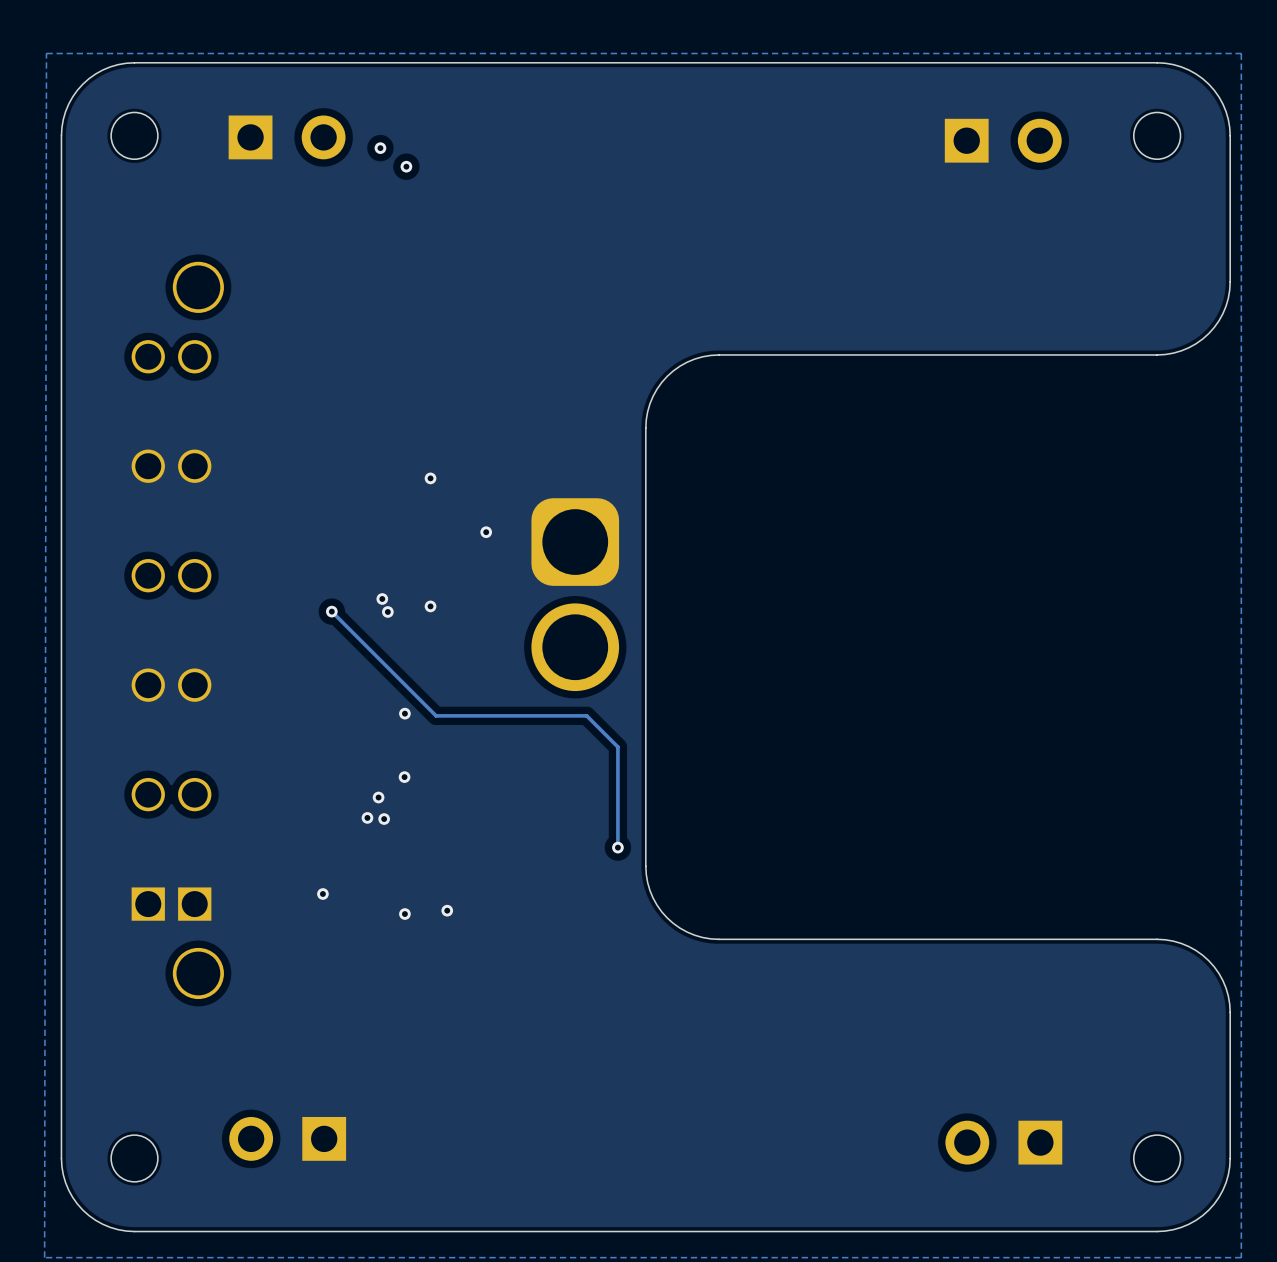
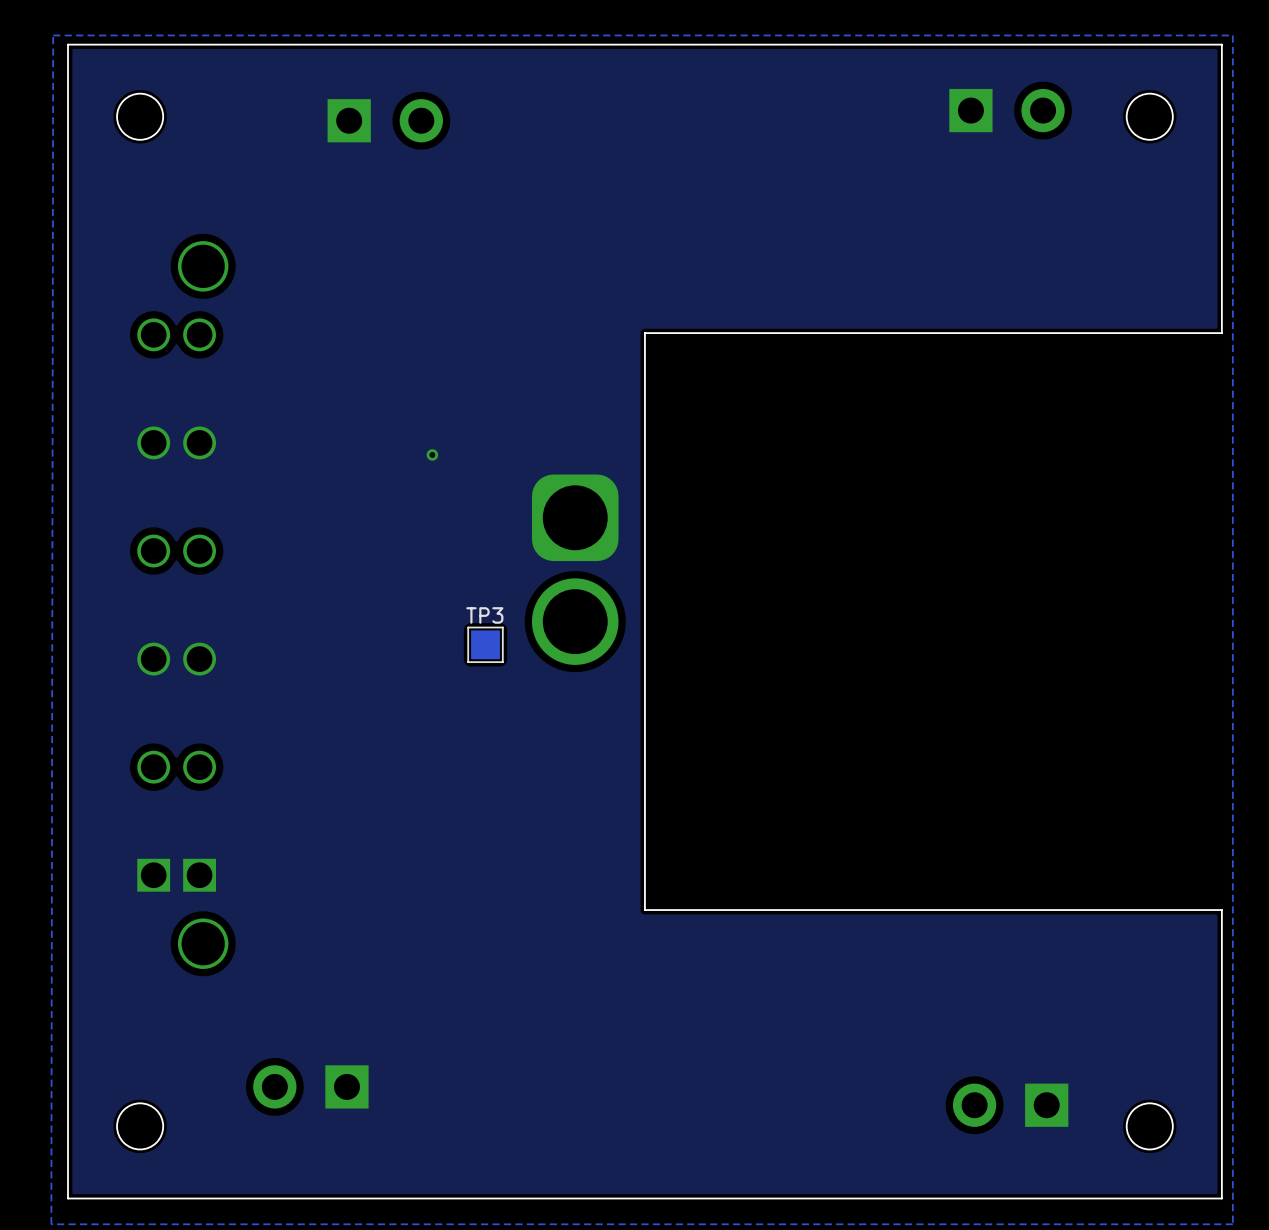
board edge: (134, 62) (118, 64) (102, 70) (82, 84) (72, 96) (65, 111) (61, 135) -> (140, 44) (68, 44) (68, 116)
board edge: (1157, 62) (1173, 64) (1188, 70) (1208, 84) (1222, 104) (1228, 119) (1230, 135) -> (1149, 44) (1221, 44) (1221, 116)
part position: (287, 137) -> (385, 120)
part position: (1003, 140) -> (1006, 110)
via: (380, 148) -> none
via: (406, 166) -> none
board edge: (1230, 281) (1228, 298) (1222, 313) (1208, 333) (1196, 343) (1181, 350) (1157, 354) -> (1221, 260) (1221, 333) (1149, 333)
board edge: (718, 354) (694, 359) (680, 366) (667, 376) (657, 389) (649, 403) (645, 428) -> (717, 333) (644, 333) (644, 405)
via: (486, 532) -> none
via: (382, 598) -> none
via: (430, 606) -> none
track: (331, 611) (436, 715) (586, 715) (617, 747) (617, 847) -> none
via: (331, 611) -> none
via: (387, 611) -> none
TP3: none -> (485, 644)
via: (404, 713) -> none
via: (404, 777) -> none
via: (378, 797) -> none
via: (367, 817) -> none
via: (384, 819) -> none
via: (617, 847) -> none
board edge: (645, 866) (649, 890) (657, 905) (667, 917) (680, 928) (694, 935) (718, 939) -> (644, 837) (644, 910) (717, 910)
via: (322, 893) -> none
via: (447, 910) -> none
via: (404, 914) -> none
board edge: (1157, 939) (1181, 943) (1196, 950) (1208, 960) (1222, 980) (1228, 996) (1230, 1012) -> (1149, 910) (1221, 910) (1221, 982)
part position: (287, 1138) -> (310, 1086)
part position: (1003, 1142) -> (1010, 1105)
board edge: (61, 1158) (65, 1182) (72, 1197) (82, 1210) (95, 1220) (110, 1227) (134, 1231) -> (68, 1126) (68, 1198) (140, 1198)
board edge: (1230, 1158) (1226, 1182) (1219, 1197) (1208, 1210) (1188, 1224) (1173, 1229) (1157, 1231) -> (1221, 1126) (1221, 1198) (1149, 1198)

